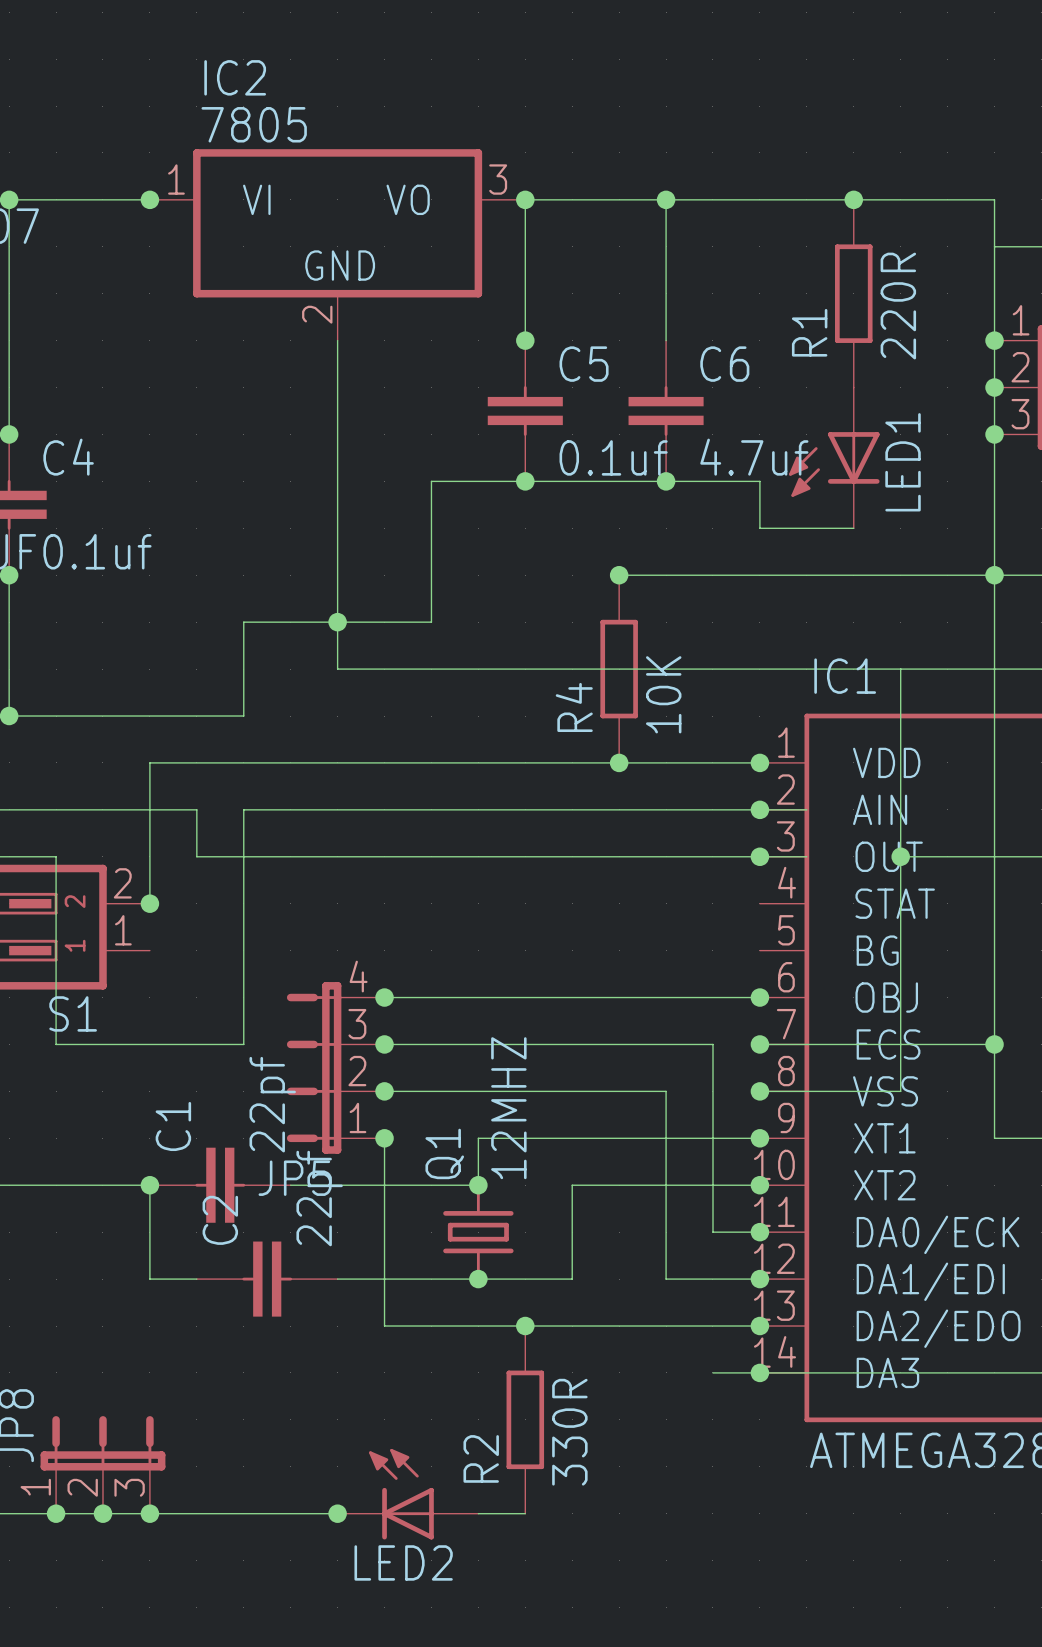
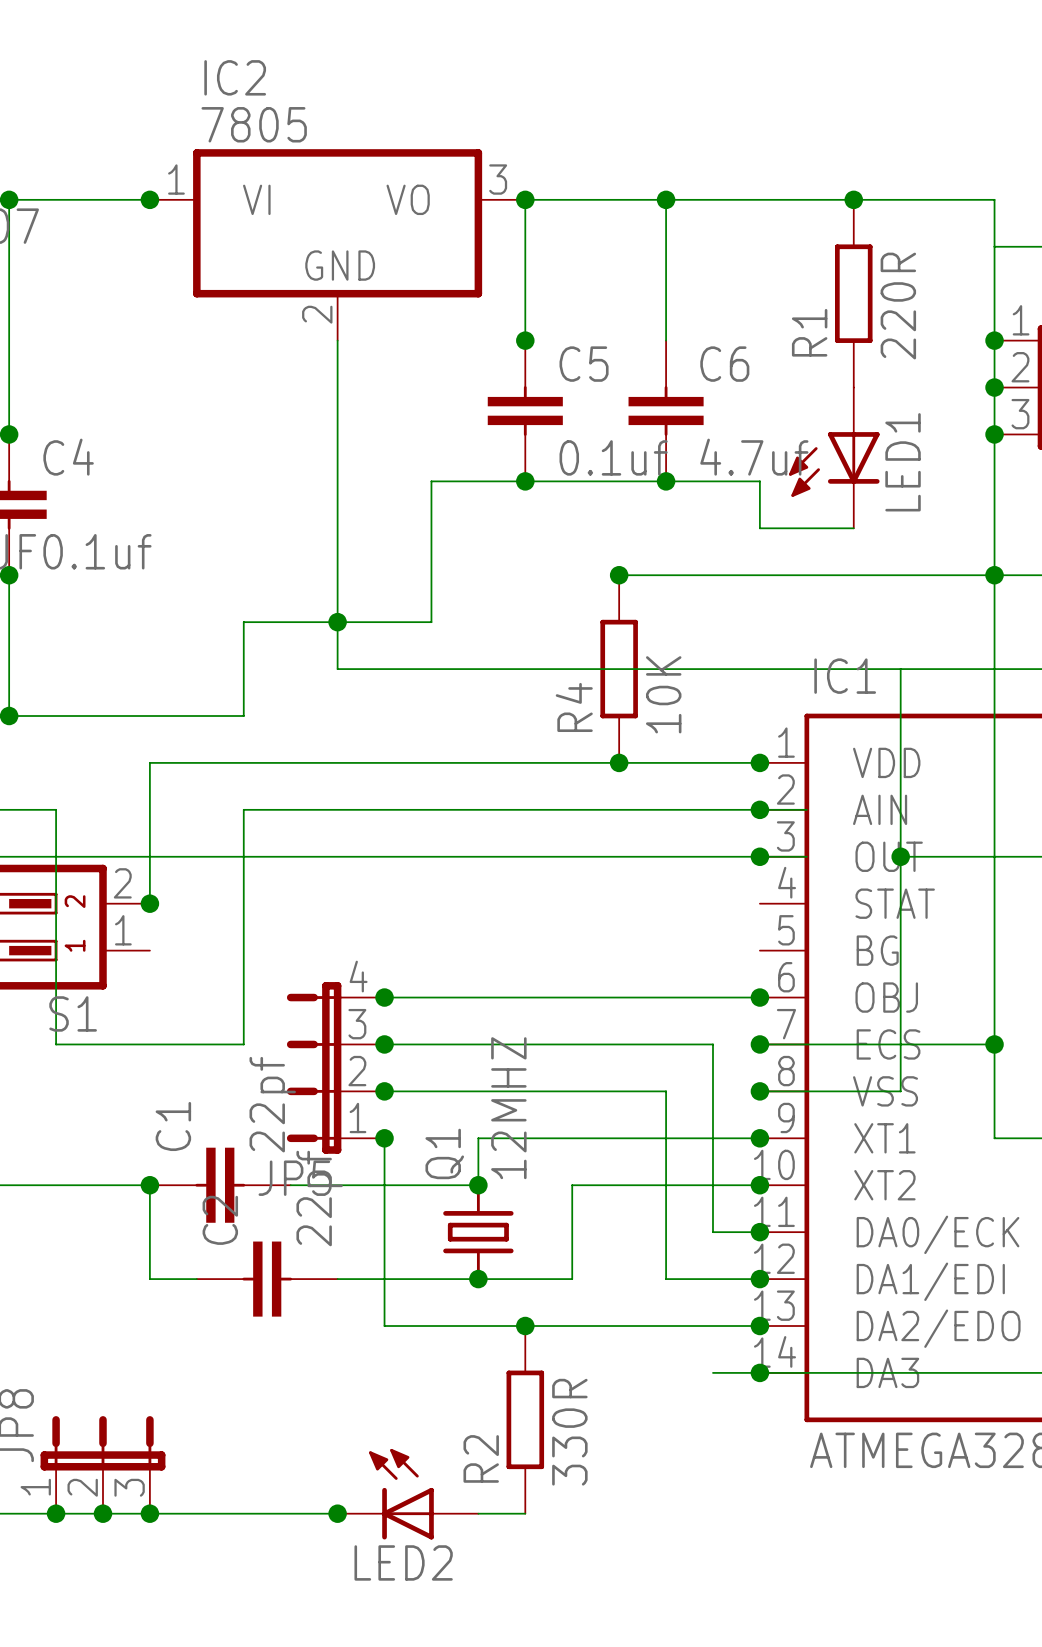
wire: (56, 809) (196, 809) (196, 856) -> (56, 809) (56, 856) (196, 856)

